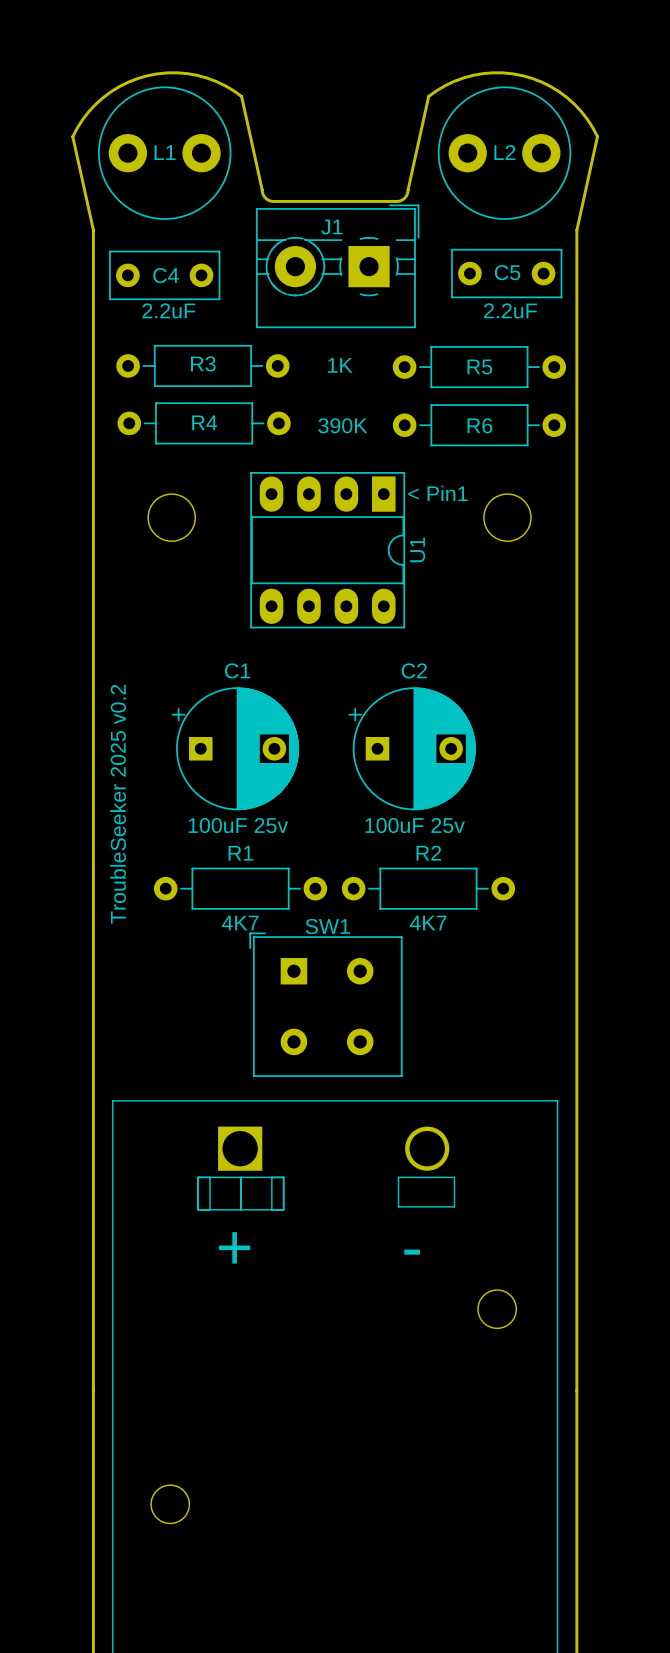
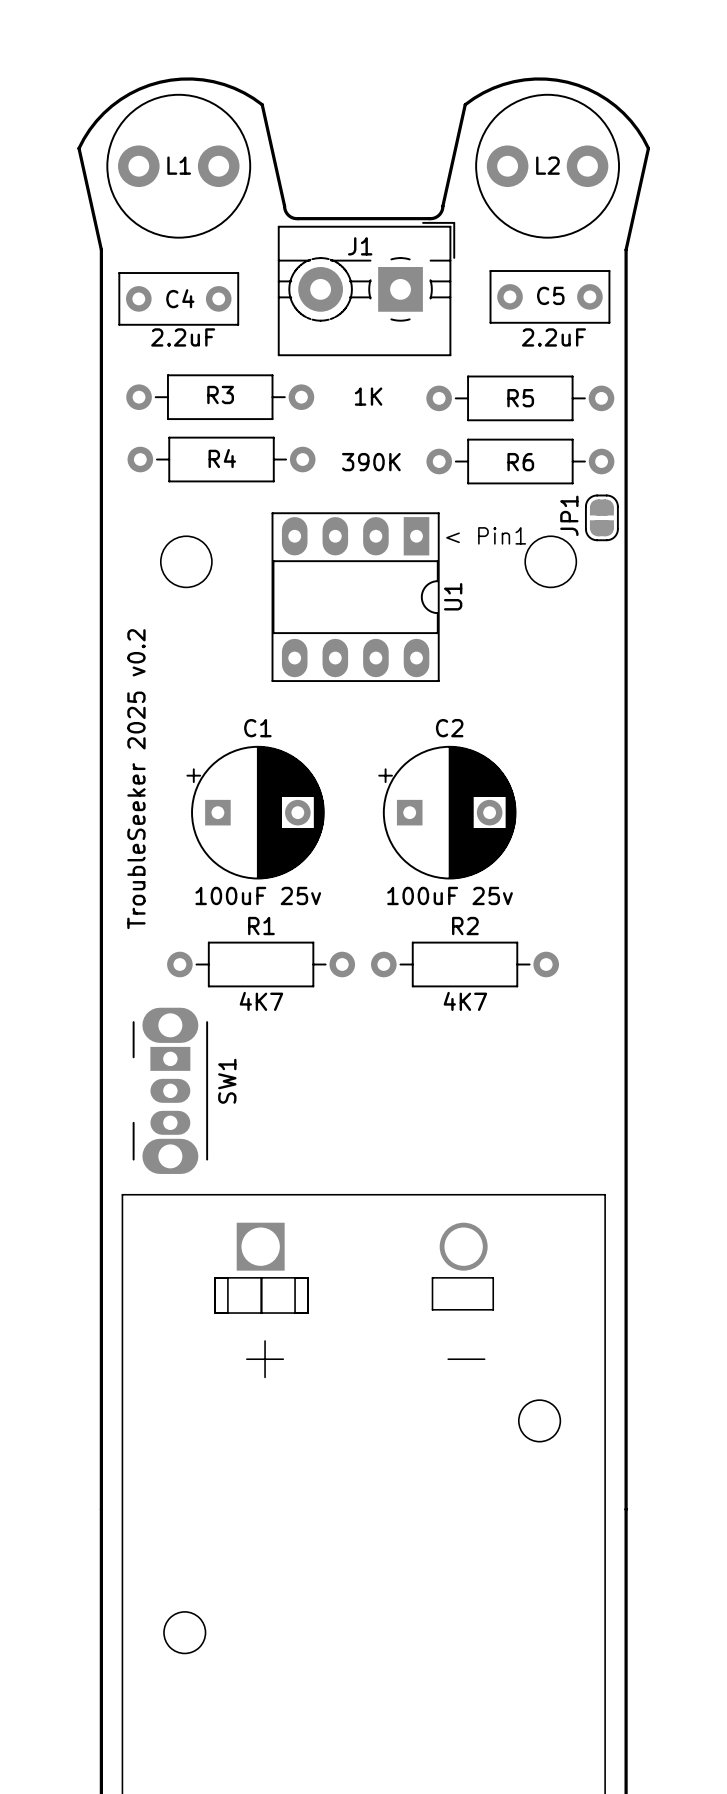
JP1: none -> (601, 517)
text position: TroubleSeeker 2025 v0.2 (118, 804) -> TroubleSeeker 2025 v0.2 (136, 779)
SW1 name position: SW1 (327, 926) -> SW1 (227, 1081)
SW1 footprint: [249, 932, 403, 1077] -> [132, 1007, 209, 1174]

